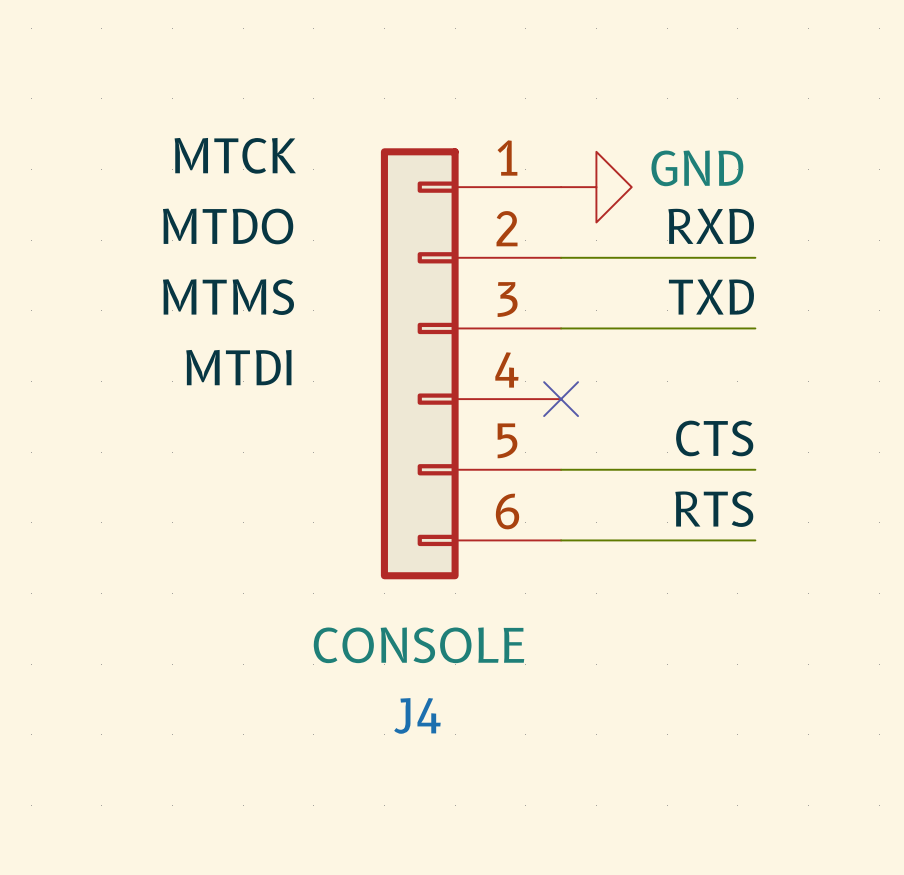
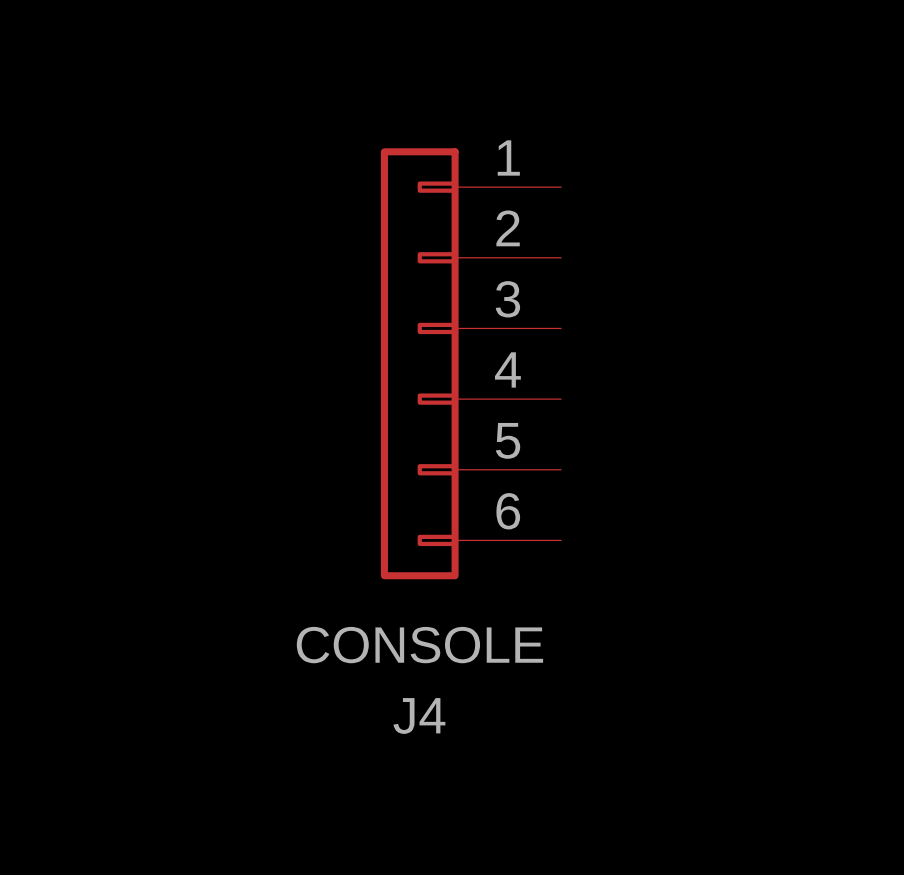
label: MTCK (235, 155) -> none
power symbol: GND (596, 187) -> none
label: MTDO (228, 226) -> none
label: RXD (711, 226) -> none
wire: (561, 257) (755, 257) -> none
label: TXD (711, 296) -> none
label: MTMS (228, 297) -> none
wire: (561, 328) (755, 328) -> none
label: MTDI (238, 367) -> none
no-connect mark: (561, 399) -> none
label: CTS (714, 438) -> none
wire: (561, 469) (755, 469) -> none
label: RTS (714, 509) -> none
wire: (561, 540) (755, 540) -> none

